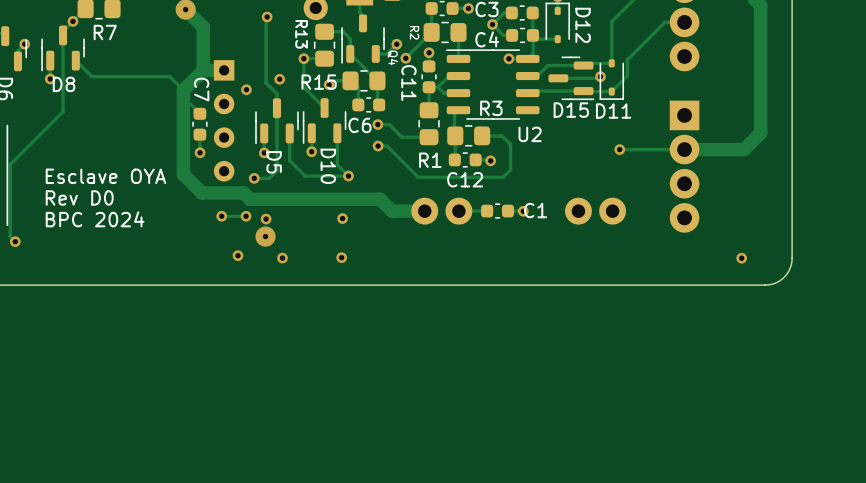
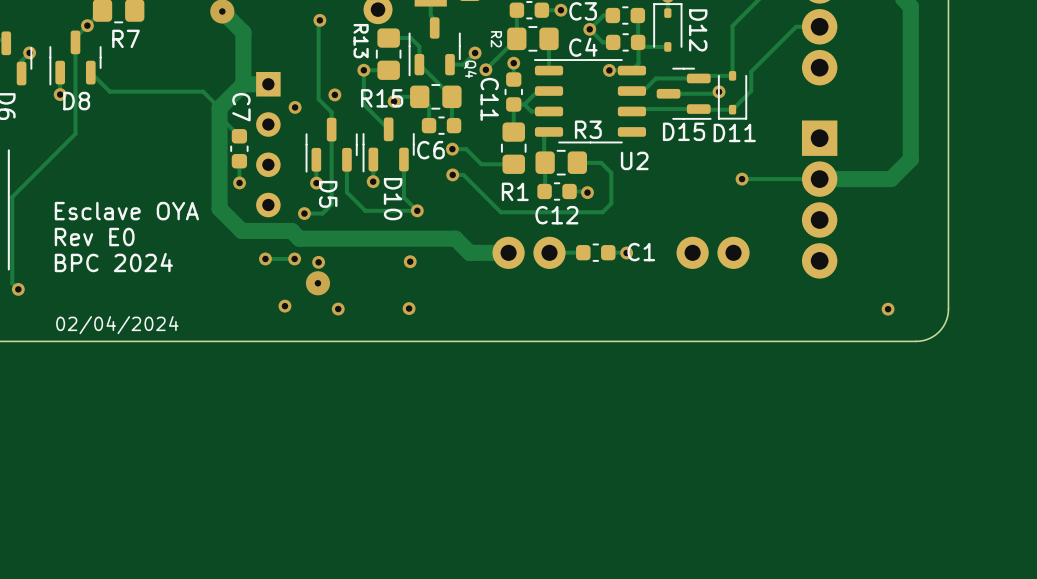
text: Rev D0 (79, 197) -> Rev E0 (94, 237)
text: none -> 02/04/2024 (117, 325)

